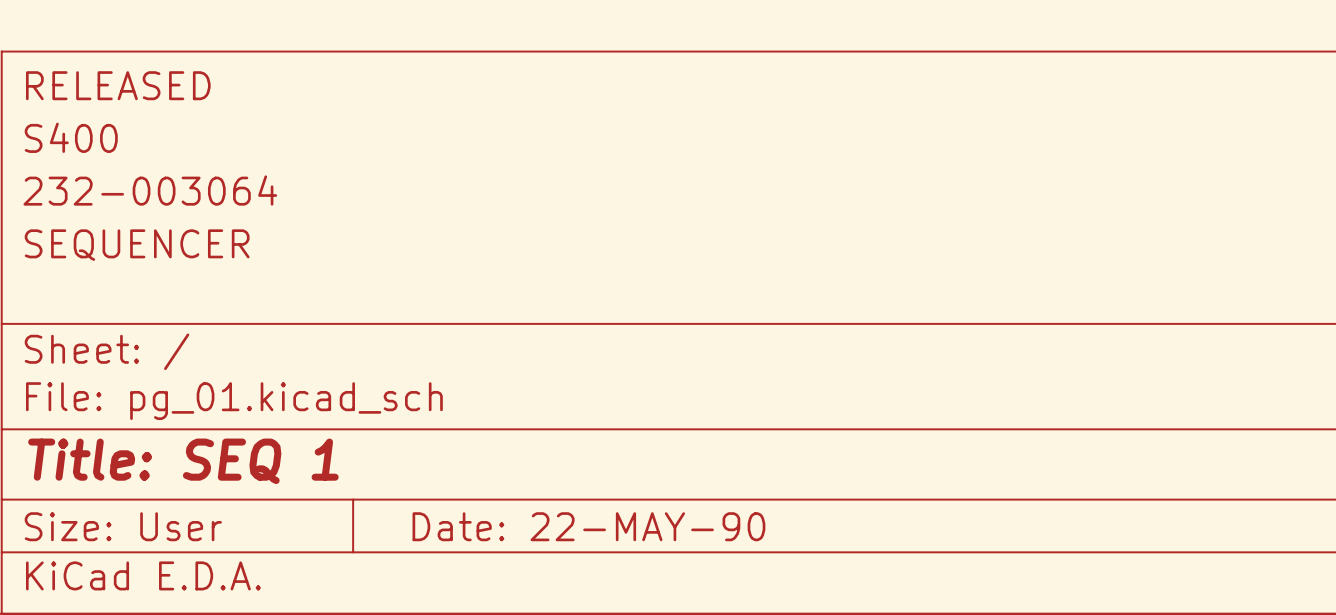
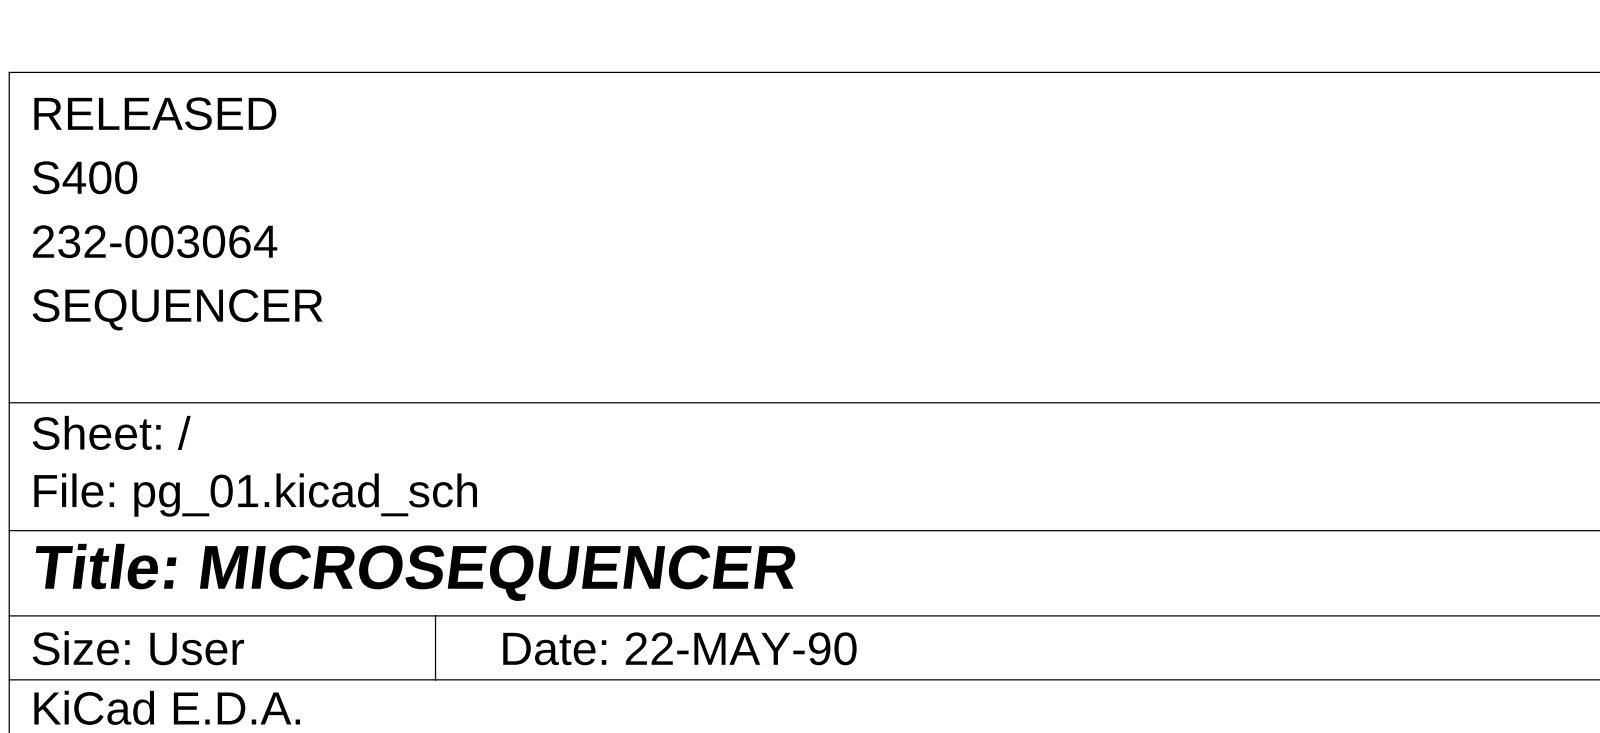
title block: Title: SEQ 1 (183, 461) -> Title: MICROSEQUENCER (415, 572)

